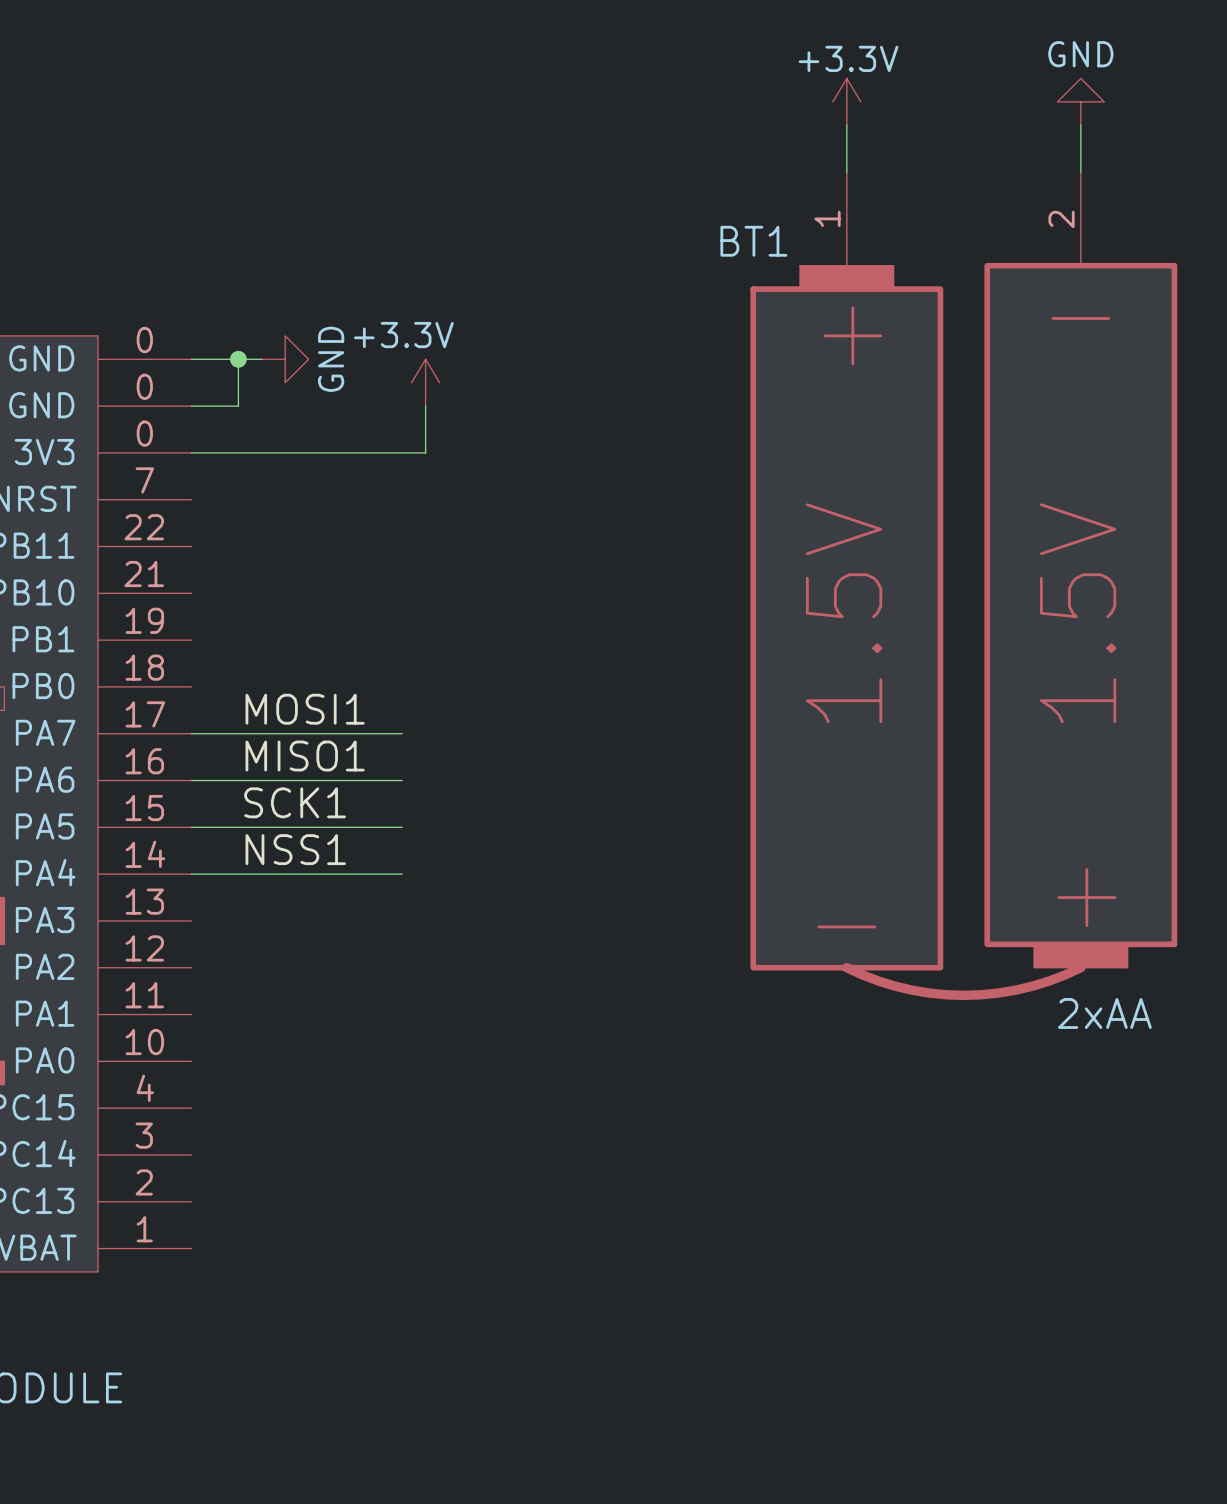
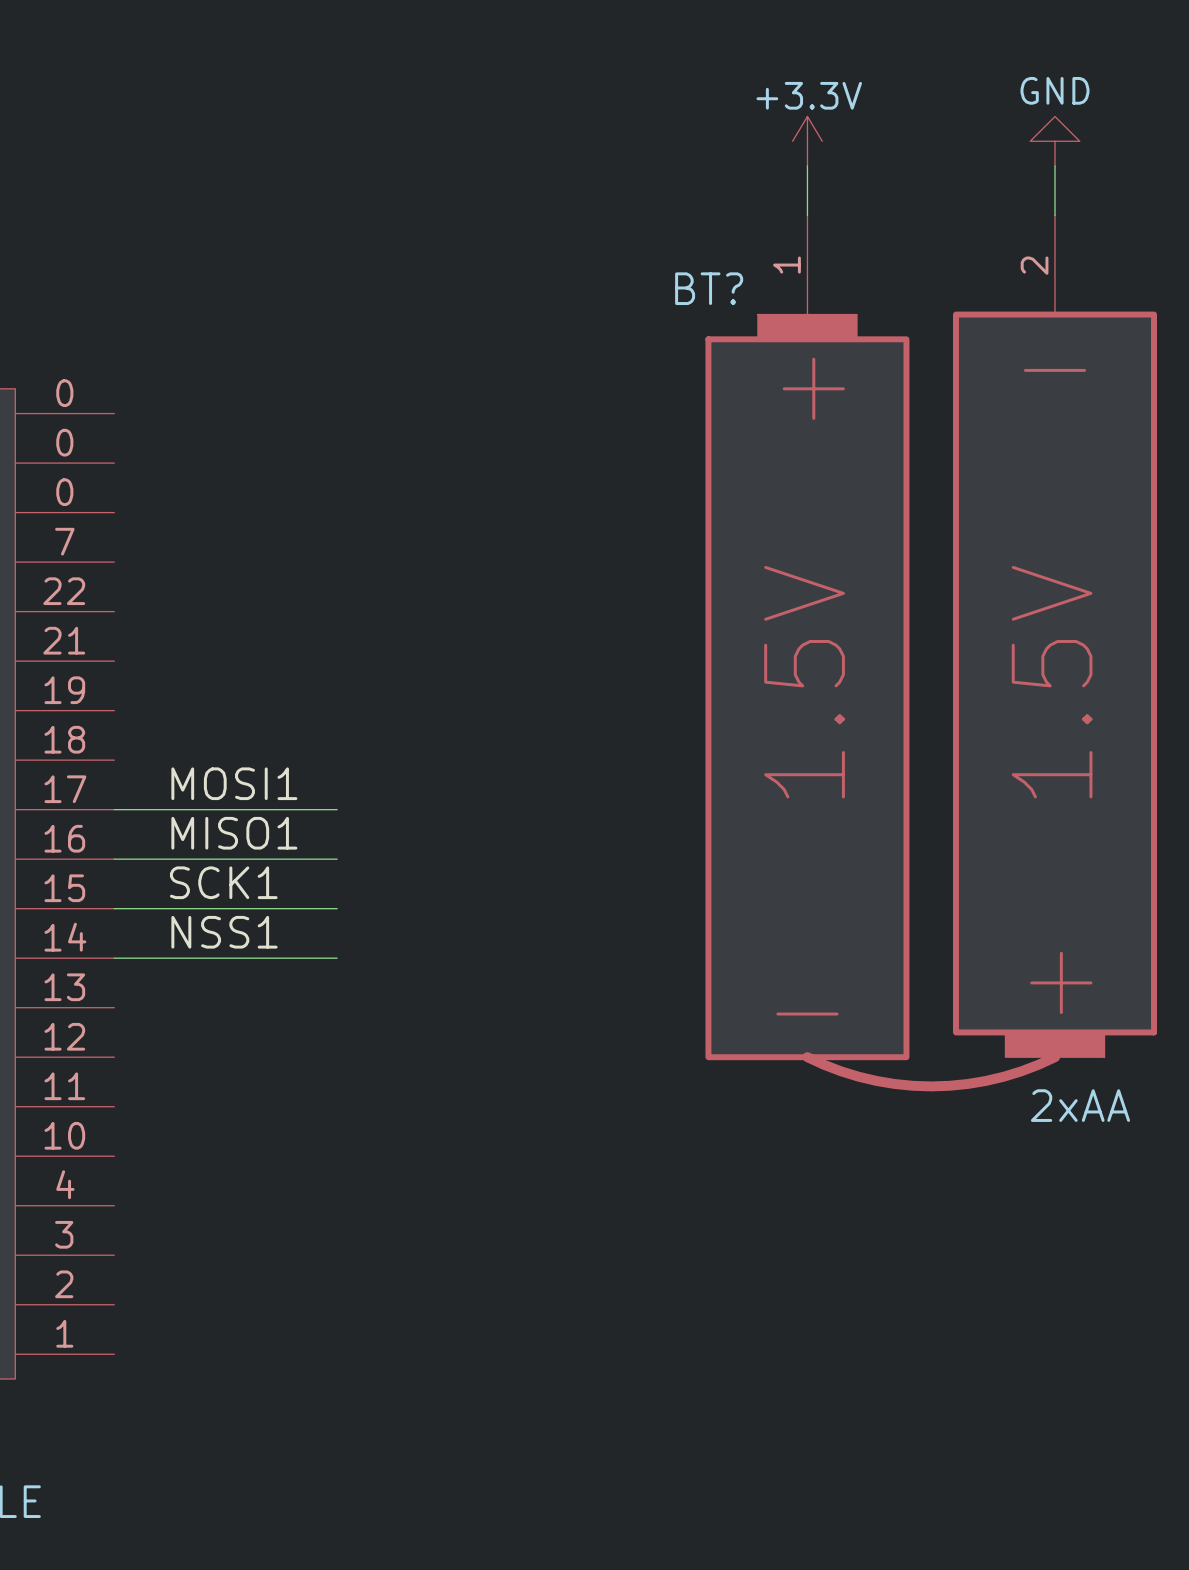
BT1 name: BT1 (753, 241) -> BT? (709, 288)
wire: (191, 359) (261, 359) -> none
wire: (238, 359) (238, 406) (191, 406) -> none
junction: (238, 359) -> none
power symbol: GND (285, 359) -> none
power symbol: +3.3V (425, 382) -> none
wire: (425, 406) (425, 452) (191, 452) -> none

